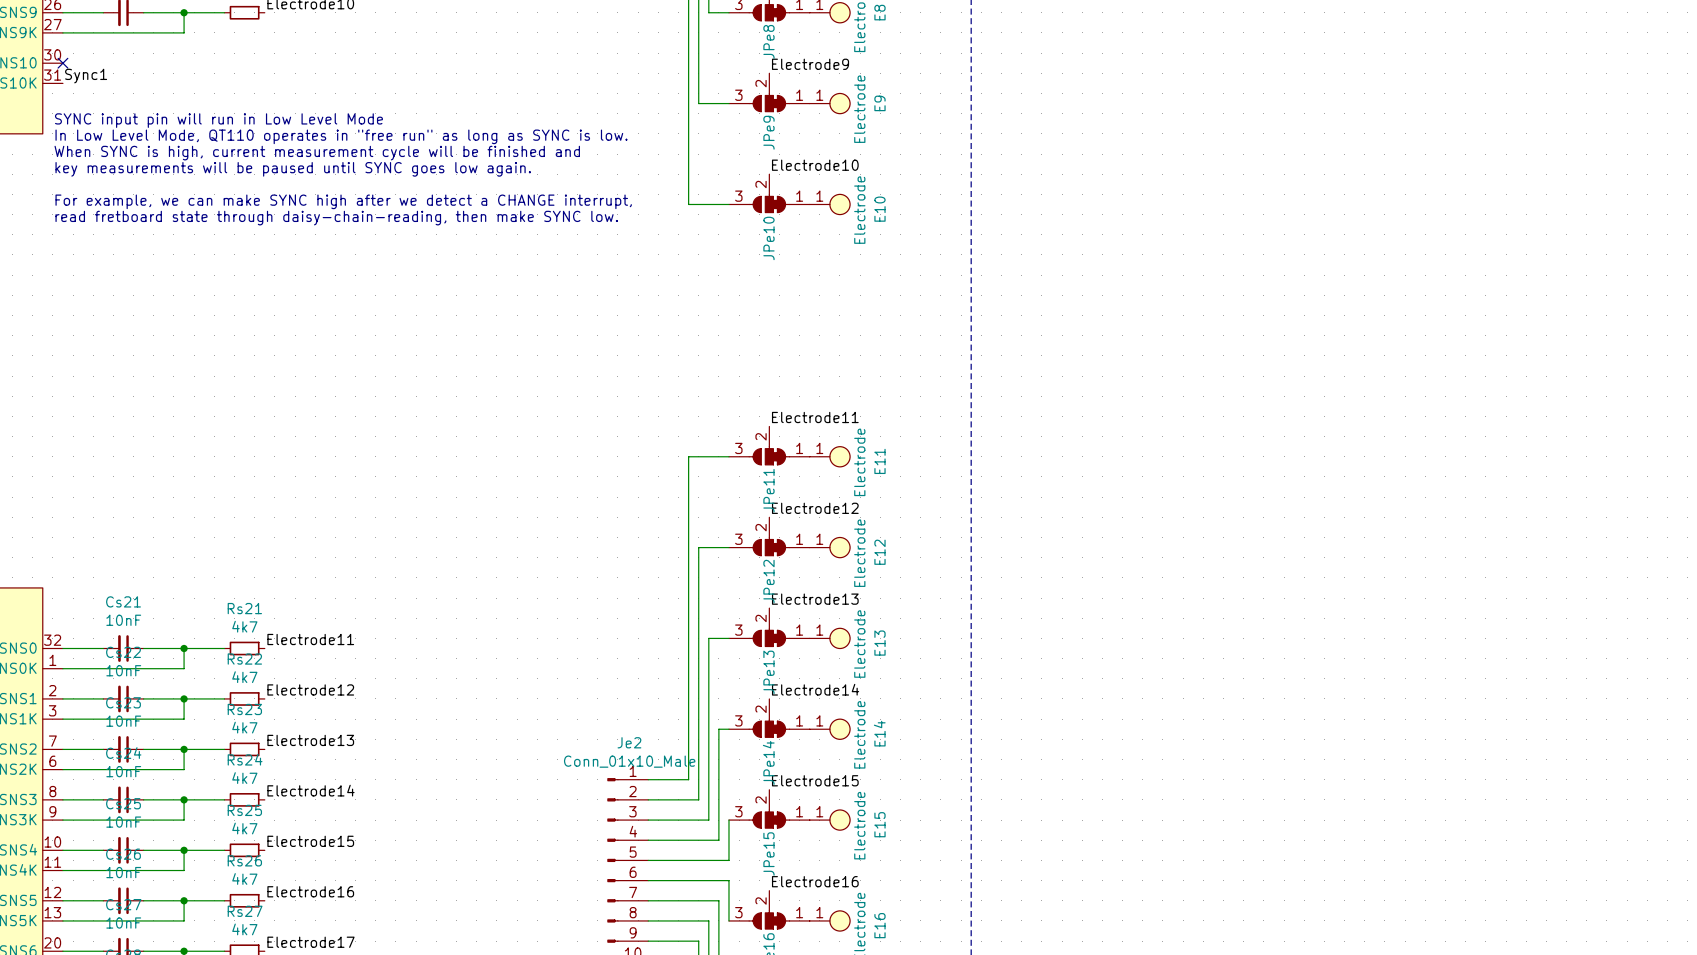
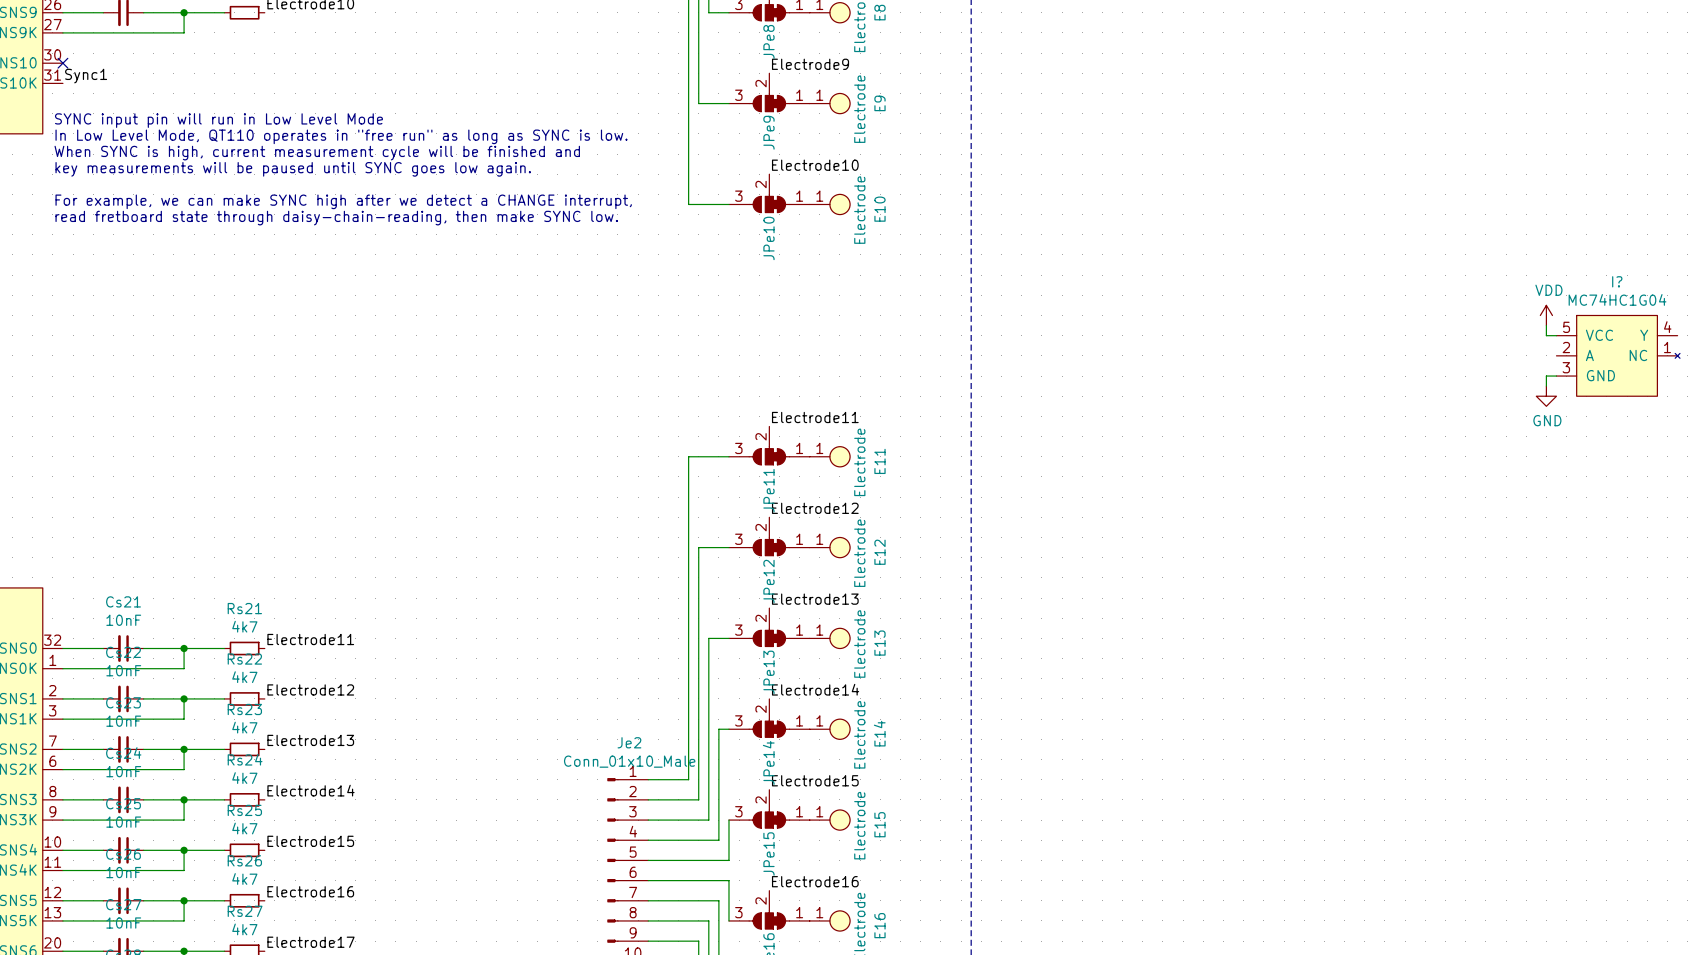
power symbol: none -> VDD (1546, 315)
wire: none -> (1546, 325) (1546, 335) (1556, 335)
I?: none -> MC74HC1G04 (1618, 355)
wire: none -> (1556, 376) (1546, 376) (1546, 386)
power symbol: none -> GND (1546, 396)

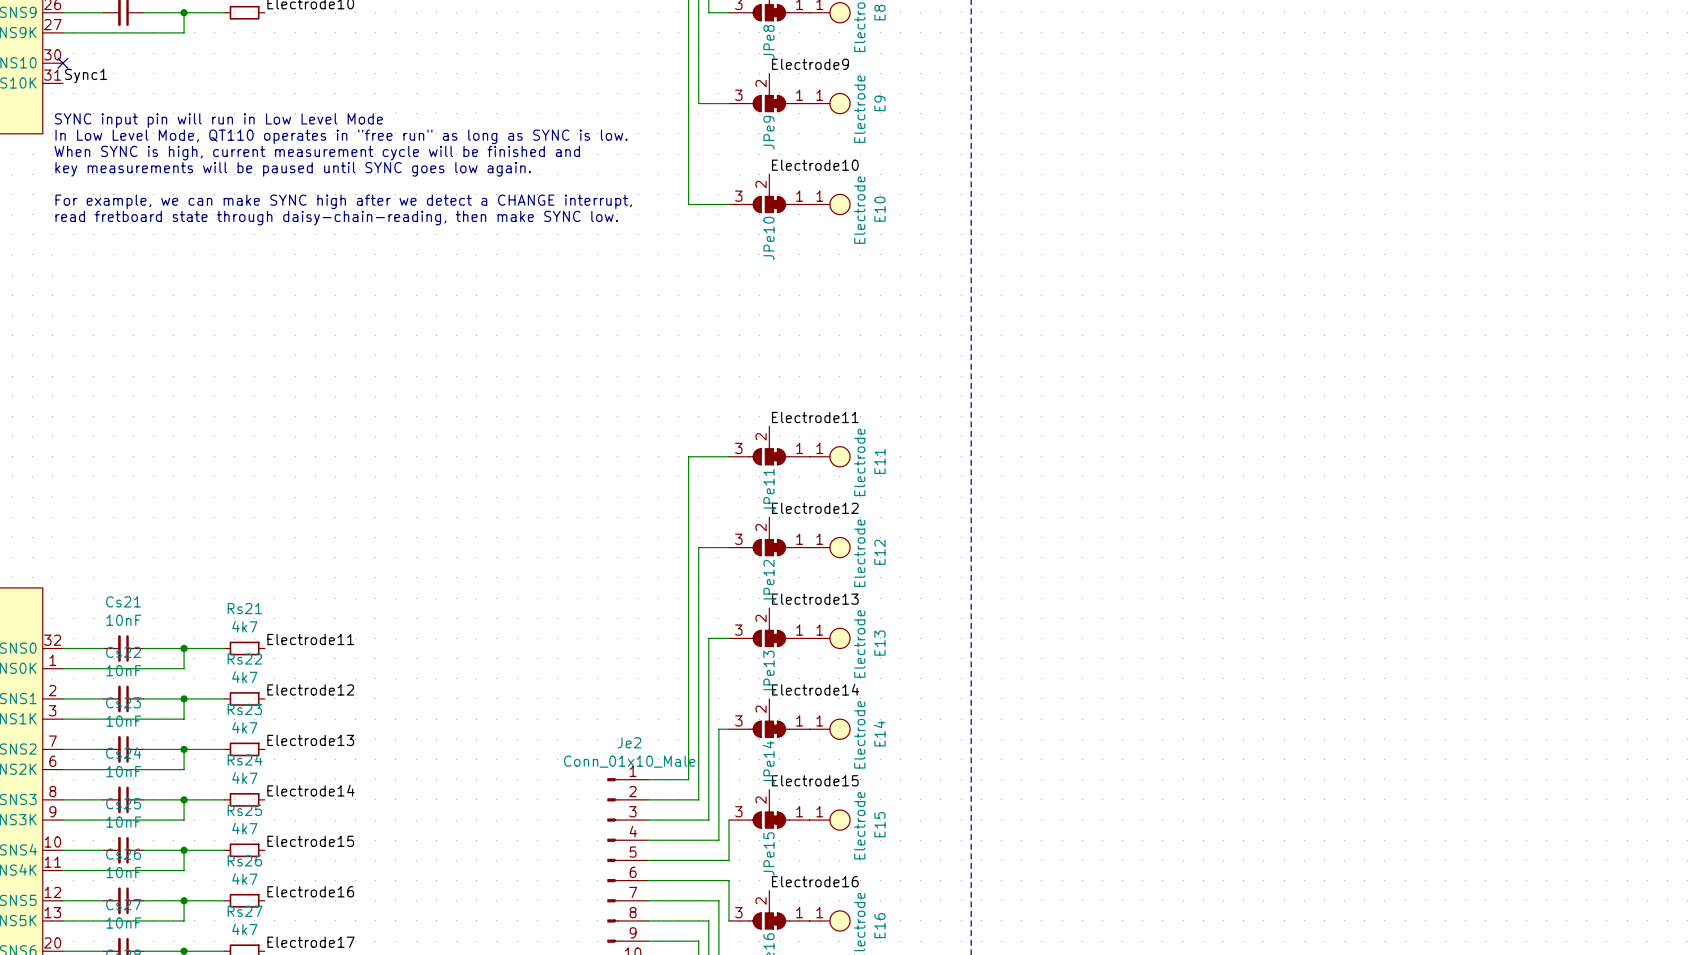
power symbol: VDD (1546, 315) -> none
wire: (1546, 325) (1546, 335) (1556, 335) -> none
I?: MC74HC1G04 (1618, 355) -> none
wire: (1556, 376) (1546, 376) (1546, 386) -> none
power symbol: GND (1546, 396) -> none

